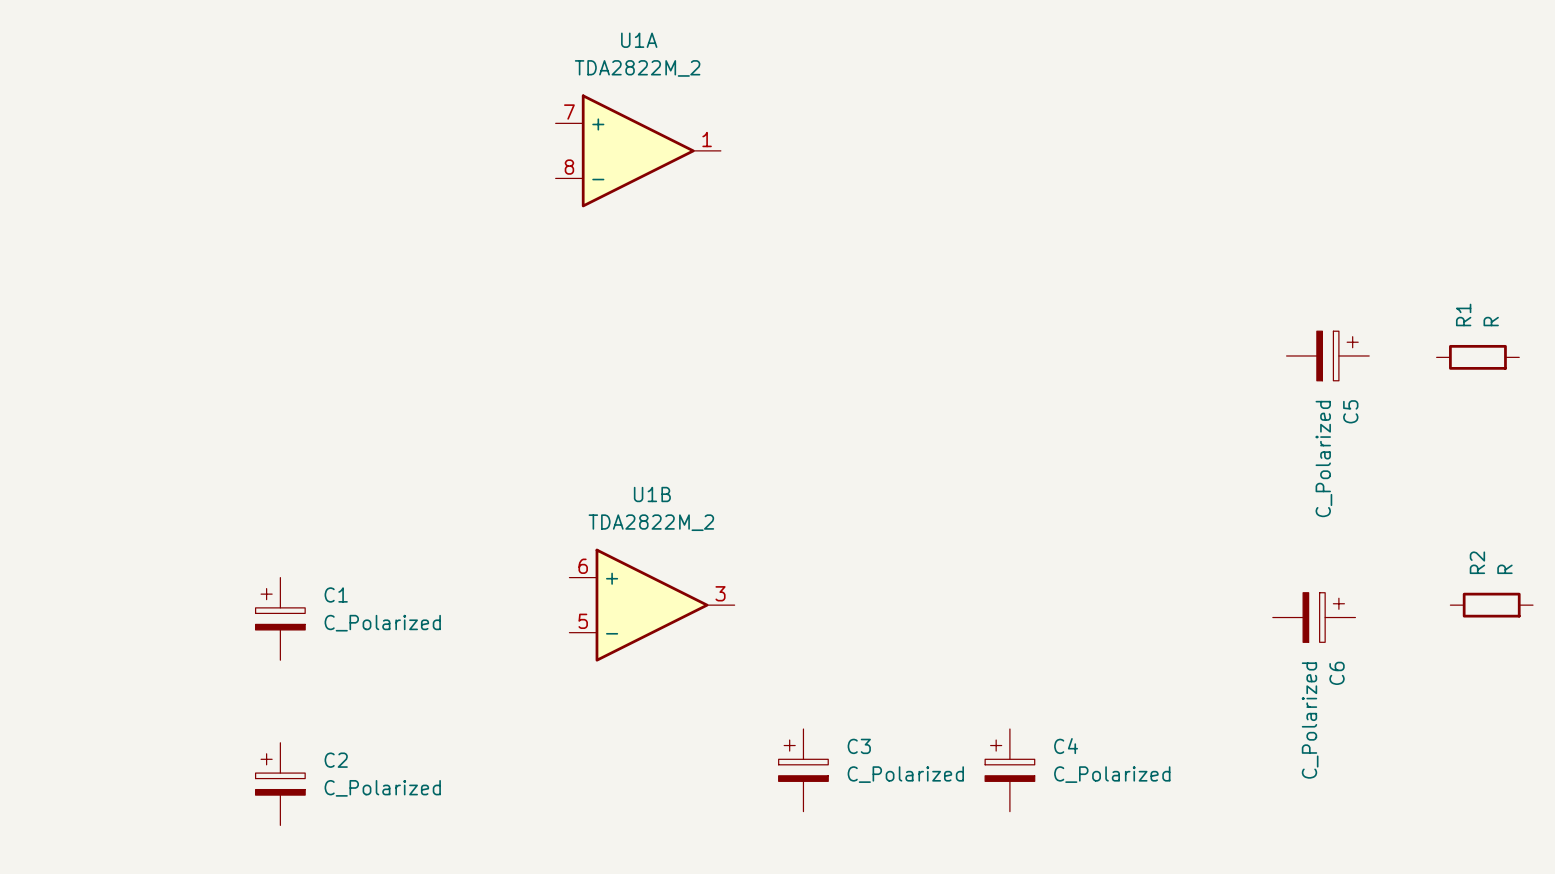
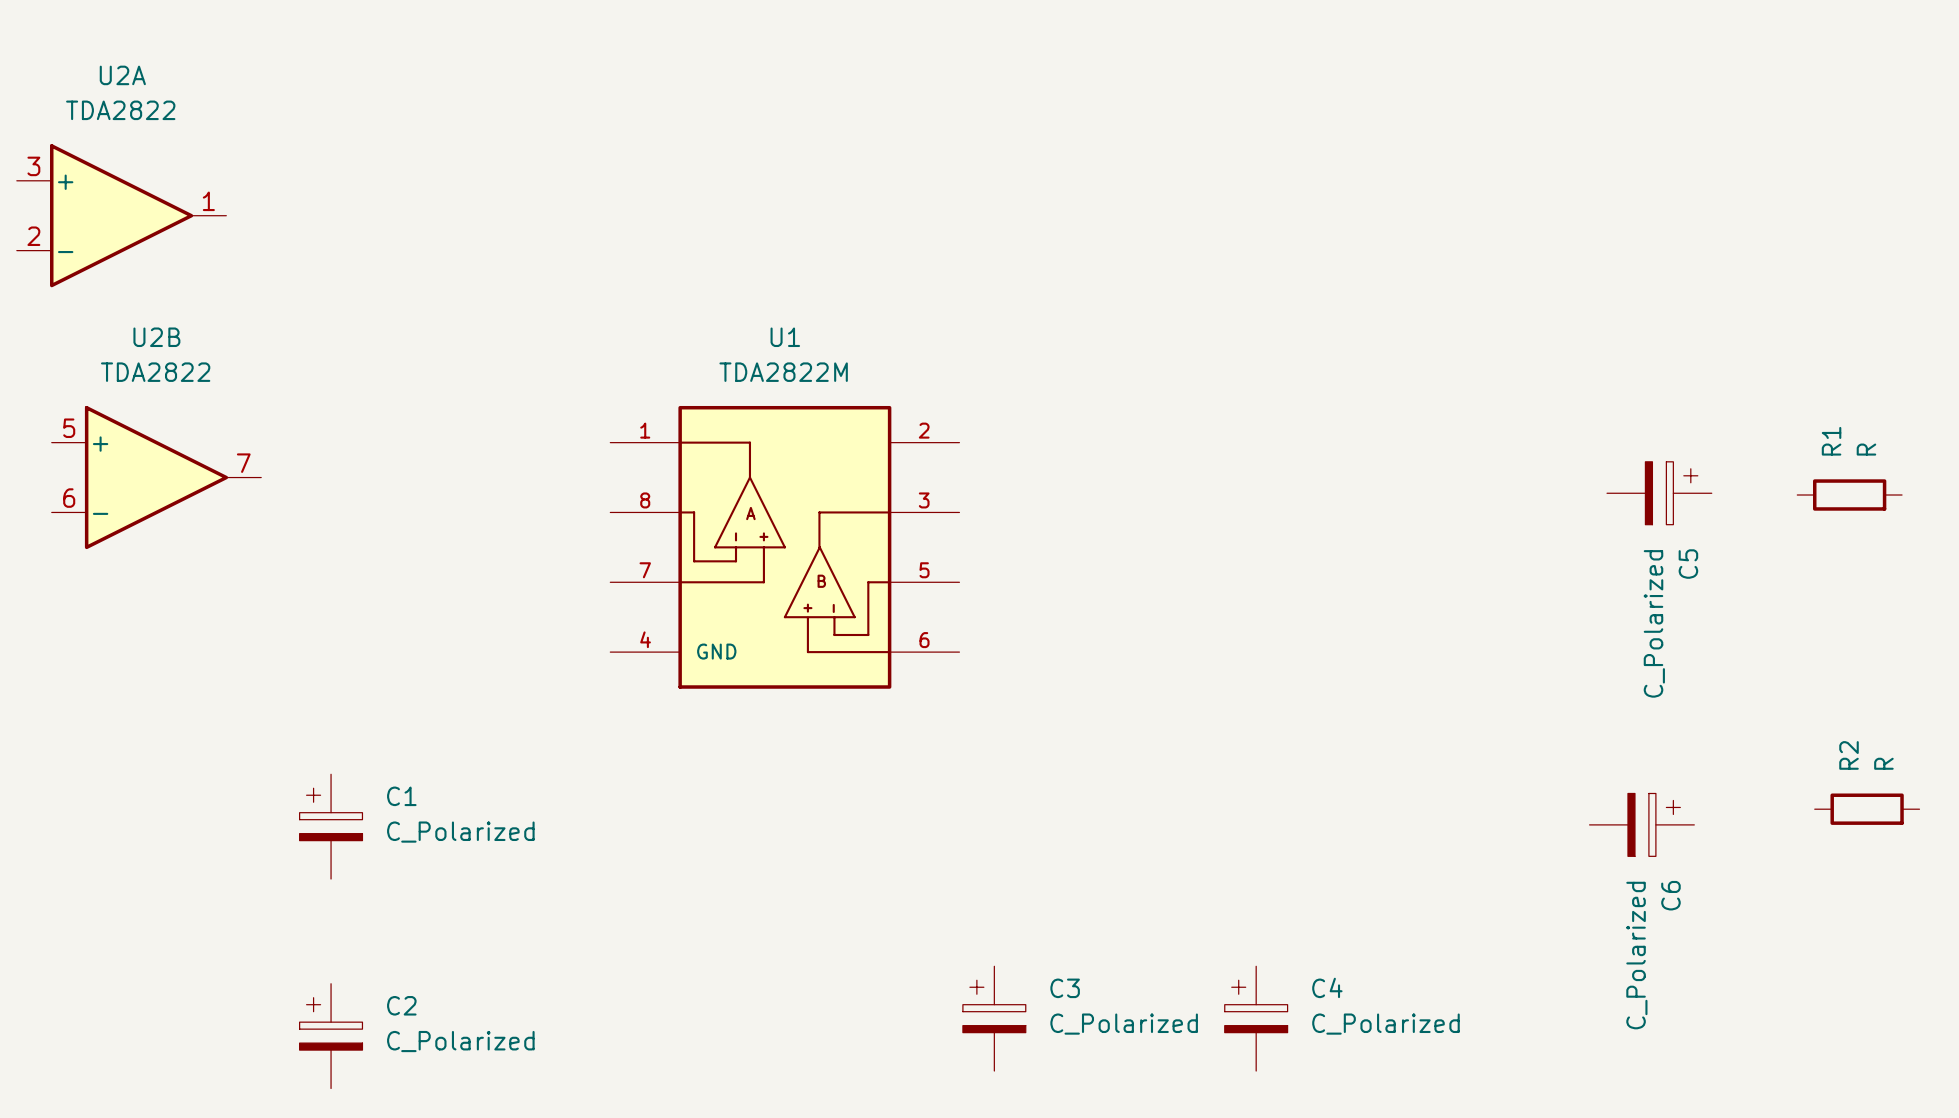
U2A: none -> TDA2822 (121, 215)
U1A: TDA2822M_2 (638, 150) -> none
U2B: none -> TDA2822 (156, 477)
U1: none -> TDA2822M (784, 547)
U1B: TDA2822M_2 (652, 605) -> none

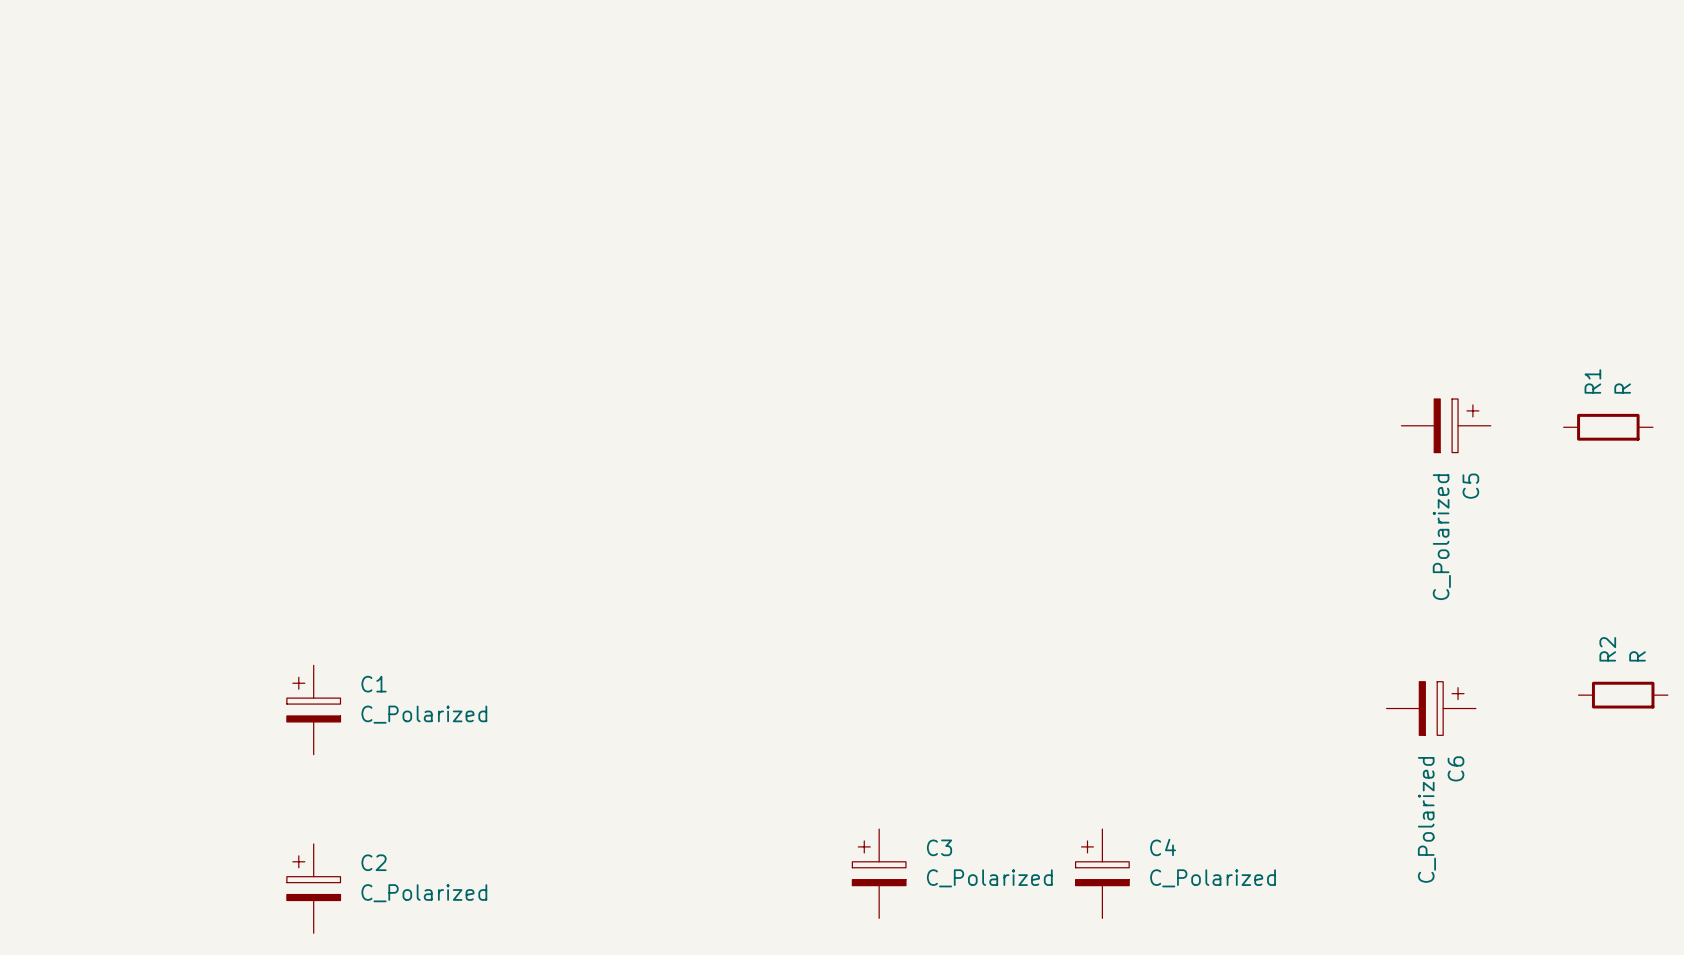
U2A: TDA2822 (121, 215) -> none
U2B: TDA2822 (156, 477) -> none
U1: TDA2822M (784, 547) -> none

